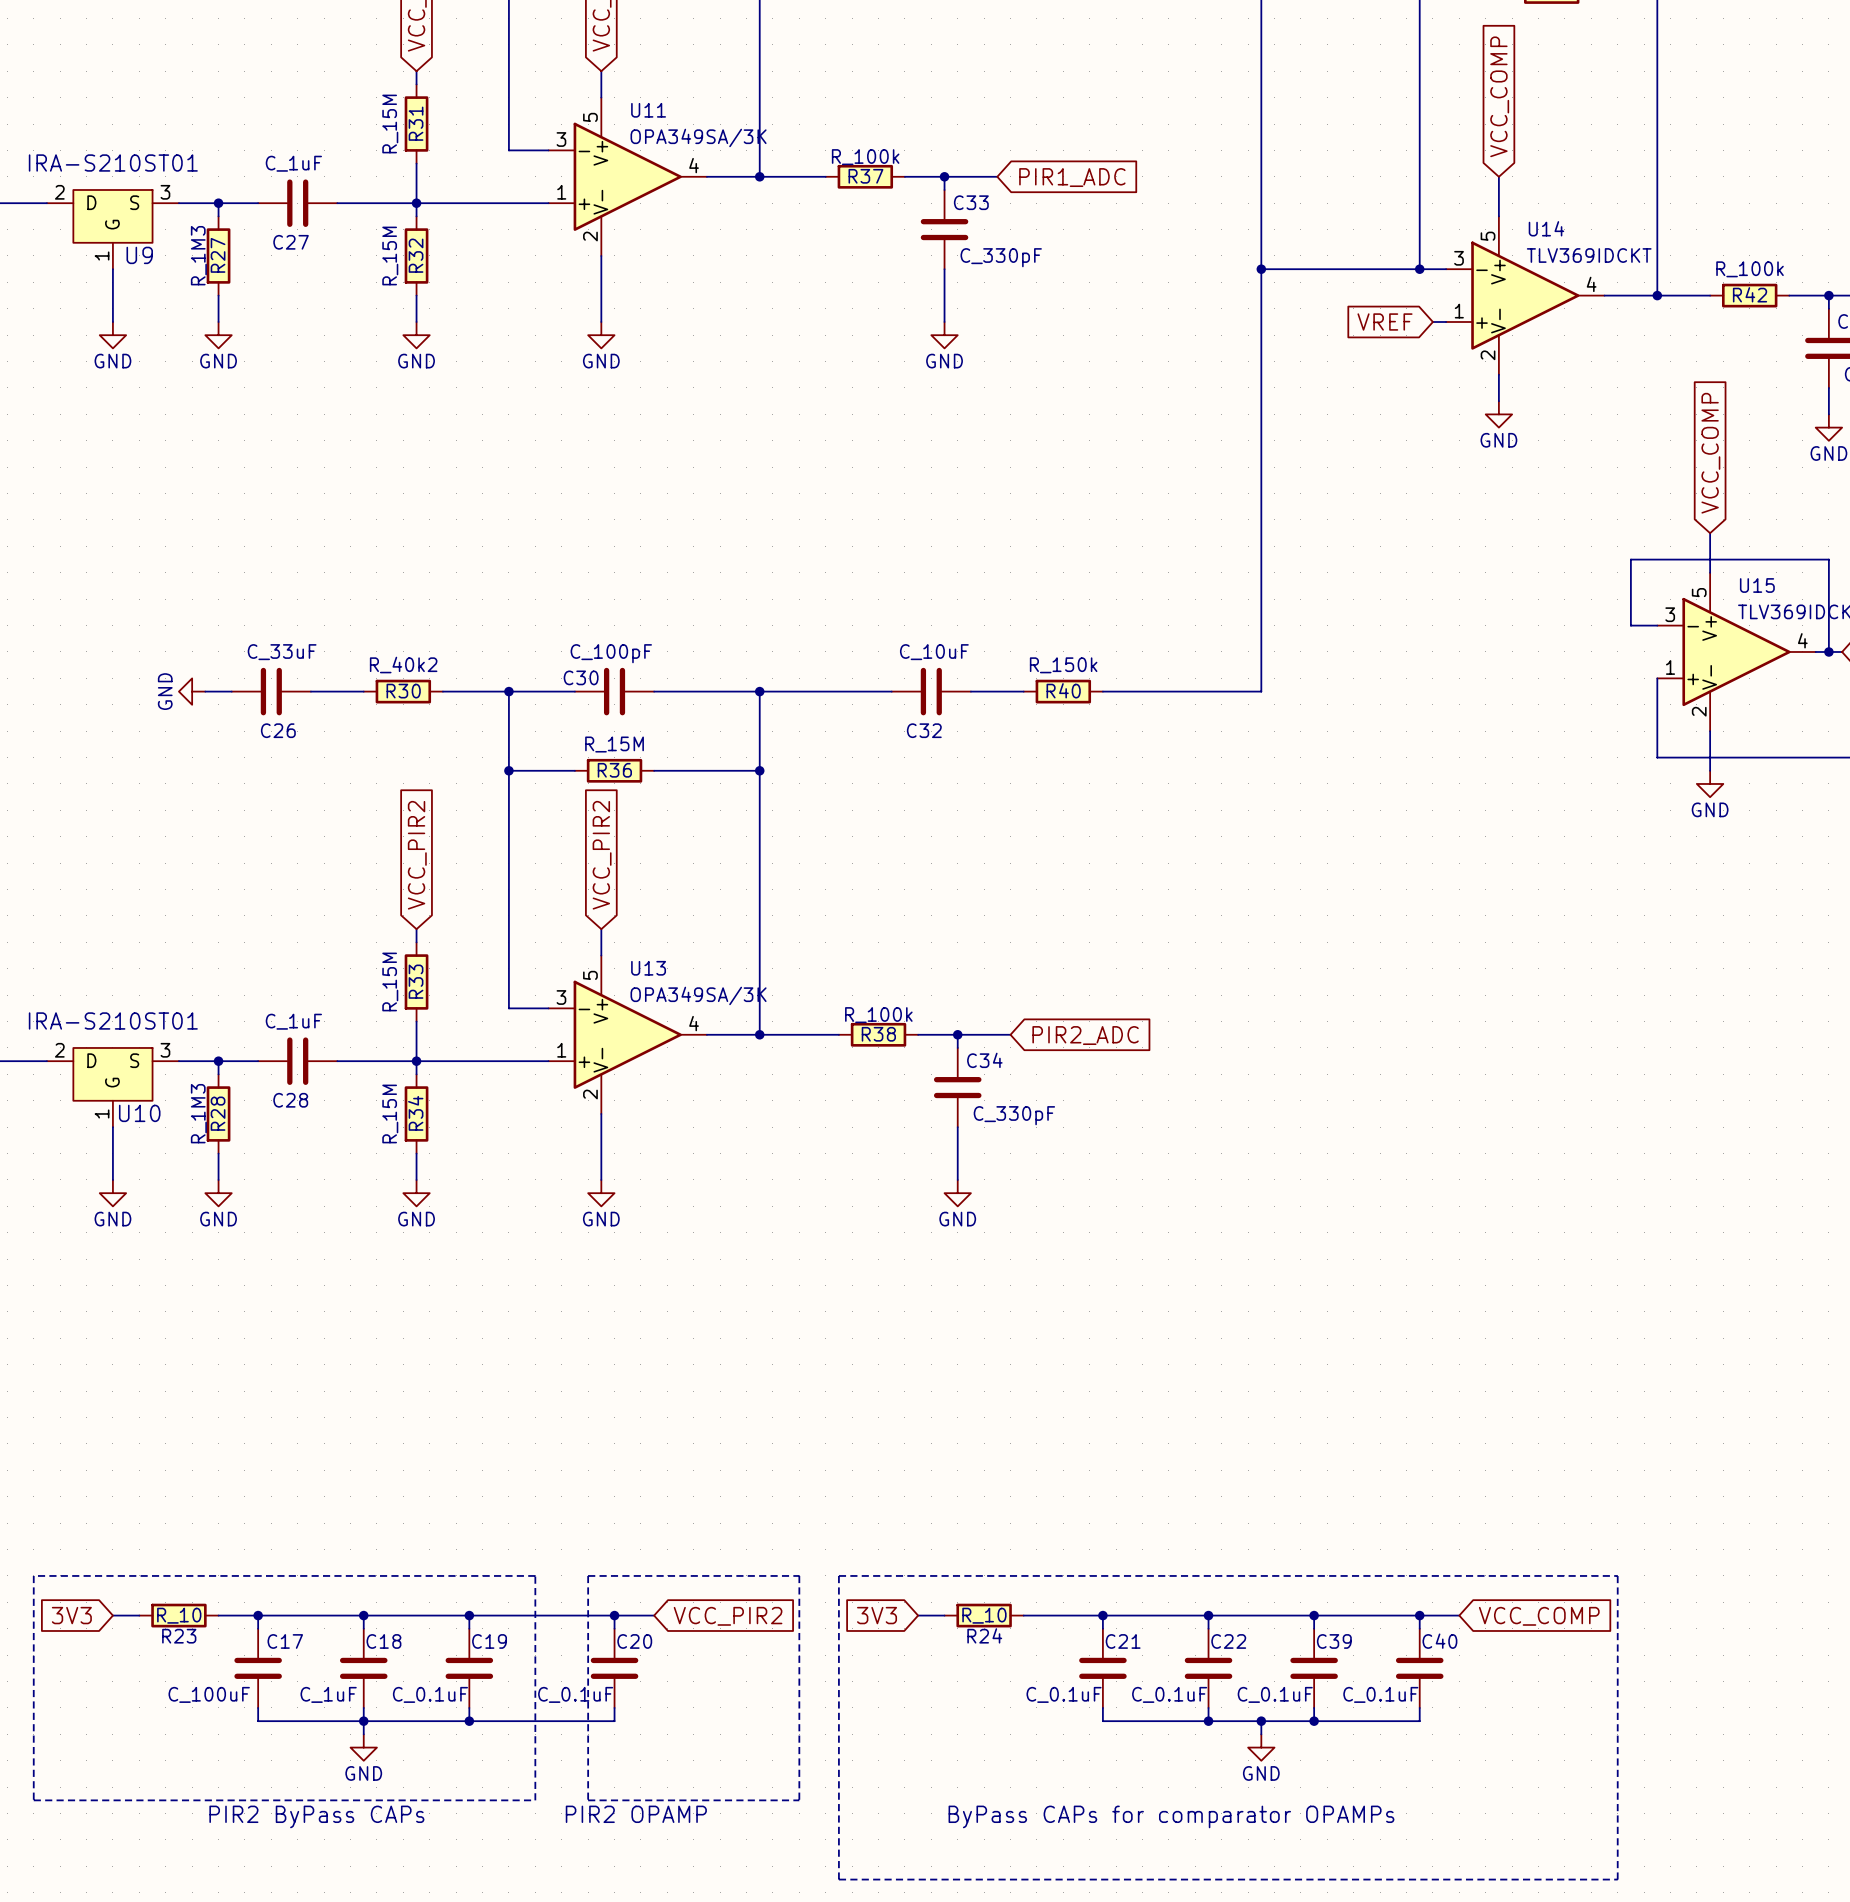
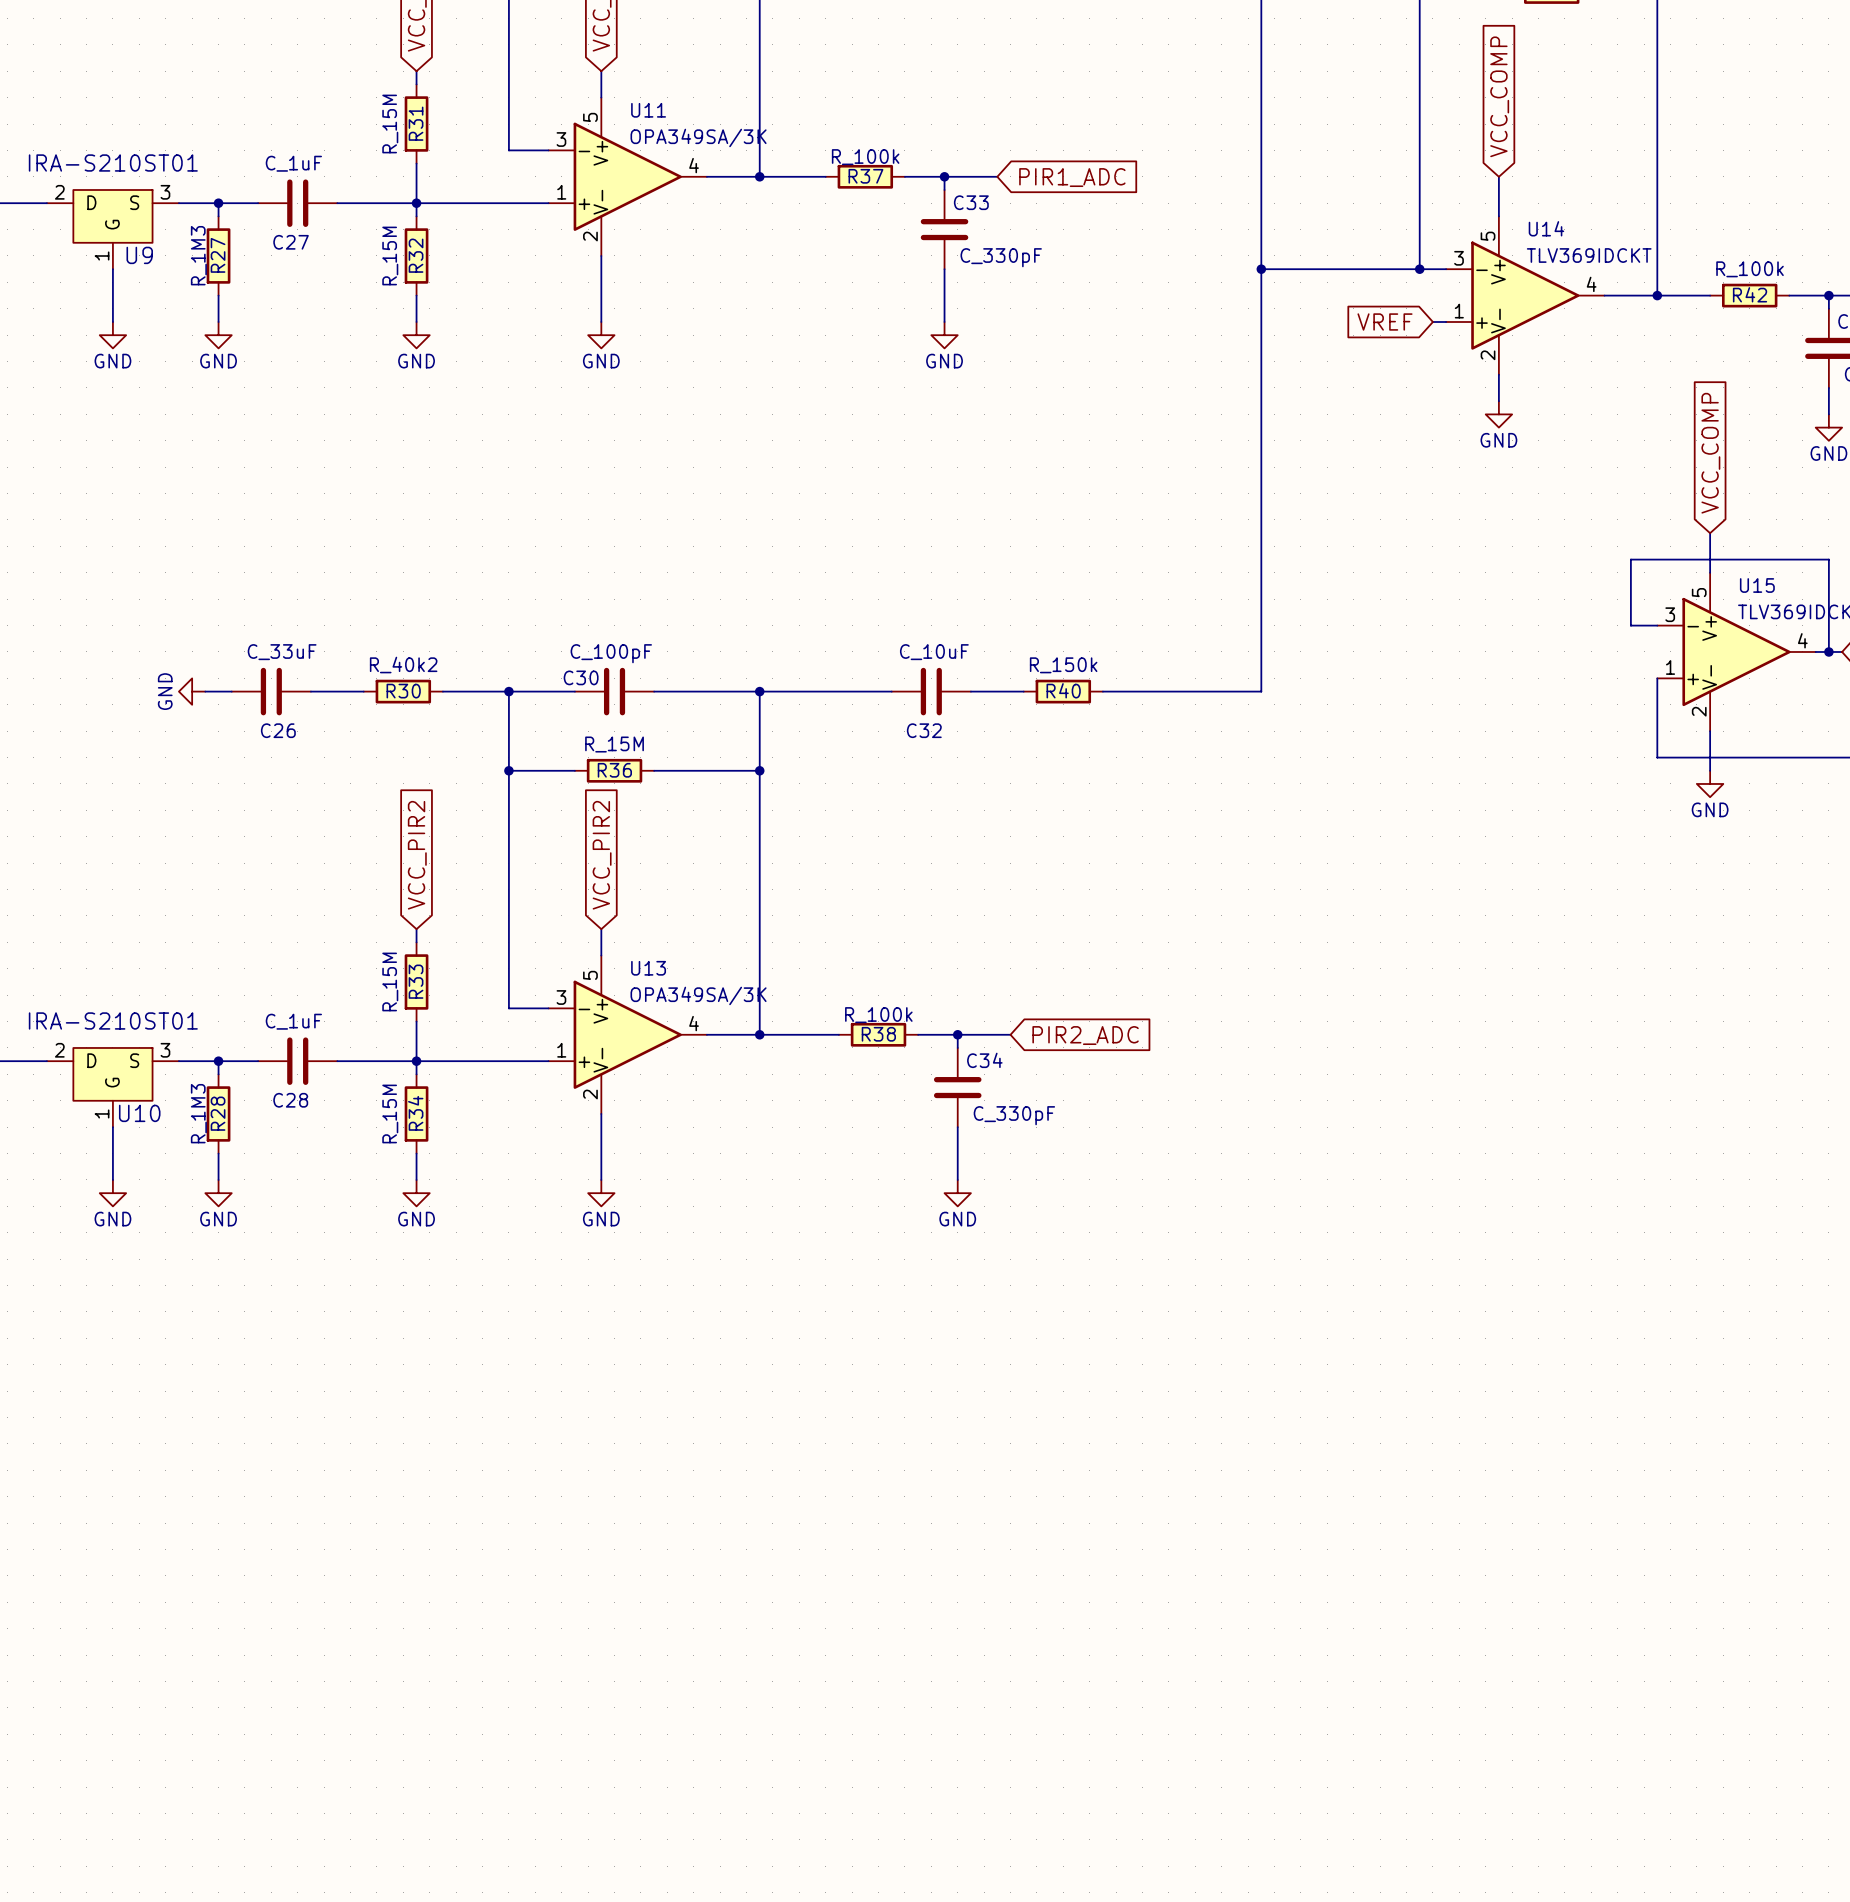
line: (33, 1575) (535, 1575) (535, 1800) (33, 1800) (33, 1575) -> none
line: (588, 1575) (799, 1575) (799, 1800) (588, 1800) (588, 1575) -> none
line: (838, 1575) (1617, 1575) (1617, 1879) (838, 1879) (838, 1575) -> none
global label: 3V3 (71, 1615) -> none
wire: (112, 1615) (139, 1615) -> none
R23: R_10 (178, 1615) -> none
wire: (218, 1615) (654, 1615) -> none
wire: (258, 1615) (258, 1628) -> none
junction: (258, 1615) -> none
wire: (363, 1615) (363, 1628) -> none
junction: (363, 1615) -> none
wire: (469, 1615) (469, 1628) -> none
junction: (469, 1615) -> none
wire: (614, 1615) (614, 1628) -> none
junction: (614, 1615) -> none
global label: 3V3 (877, 1615) -> none
wire: (918, 1615) (944, 1615) -> none
R24: R_10 (984, 1615) -> none
wire: (1023, 1615) (1459, 1615) -> none
wire: (1102, 1615) (1102, 1628) -> none
junction: (1102, 1615) -> none
wire: (1208, 1615) (1208, 1628) -> none
junction: (1208, 1615) -> none
wire: (1314, 1615) (1314, 1628) -> none
junction: (1314, 1615) -> none
wire: (1419, 1615) (1419, 1628) -> none
junction: (1419, 1615) -> none
global label: VCC_PIR2 (728, 1616) -> none
global label: VCC_COMP (1539, 1616) -> none
C17: C_100uF (258, 1668) -> none
C18: C_1uF (363, 1668) -> none
C19: C_0.1uF (469, 1668) -> none
C20: C_0.1uF (614, 1668) -> none
C21: C_0.1uF (1102, 1668) -> none
C22: C_0.1uF (1208, 1668) -> none
C39: C_0.1uF (1314, 1668) -> none
C40: C_0.1uF (1419, 1668) -> none
wire: (258, 1707) (258, 1721) (614, 1721) (614, 1707) -> none
wire: (363, 1707) (363, 1734) -> none
wire: (469, 1707) (469, 1721) -> none
wire: (1102, 1707) (1102, 1721) (1419, 1721) (1419, 1707) -> none
wire: (1208, 1707) (1208, 1721) -> none
wire: (1314, 1707) (1314, 1721) -> none
junction: (363, 1721) -> none
junction: (469, 1721) -> none
junction: (1208, 1721) -> none
wire: (1261, 1721) (1261, 1734) -> none
junction: (1261, 1721) -> none
junction: (1314, 1721) -> none
power symbol: GND (363, 1747) -> none
power symbol: GND (1261, 1747) -> none
text: PIR2 OPAMP (636, 1814) -> none
text: PIR2 ByPass CAPs (316, 1816) -> none
text: ByPass CAPs for comparator OPAMPs (1171, 1816) -> none

